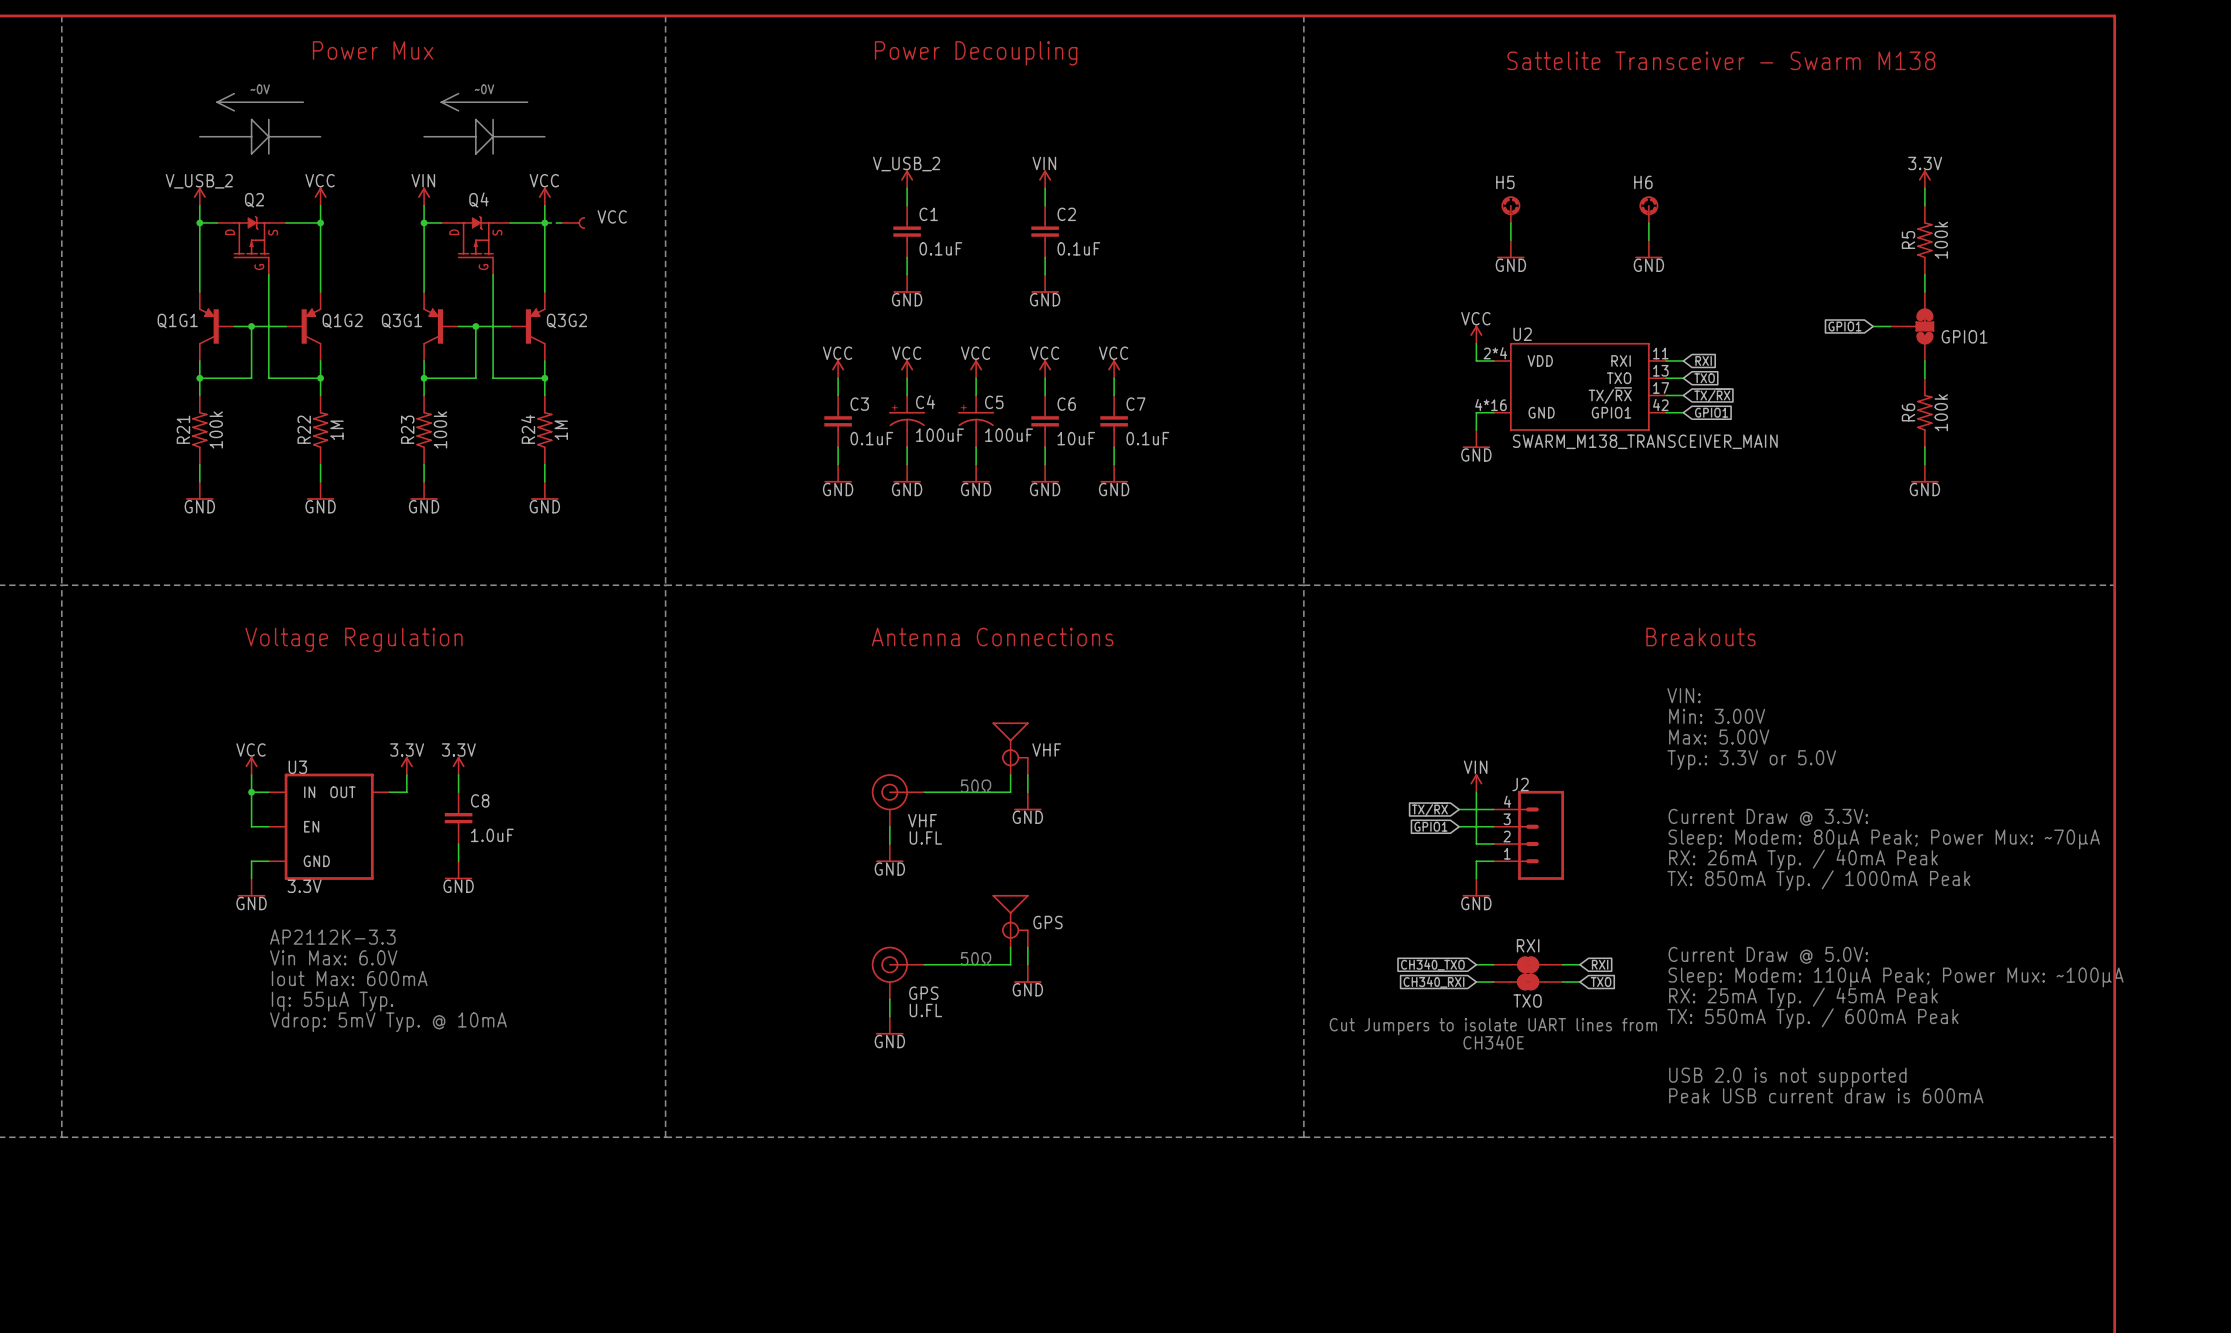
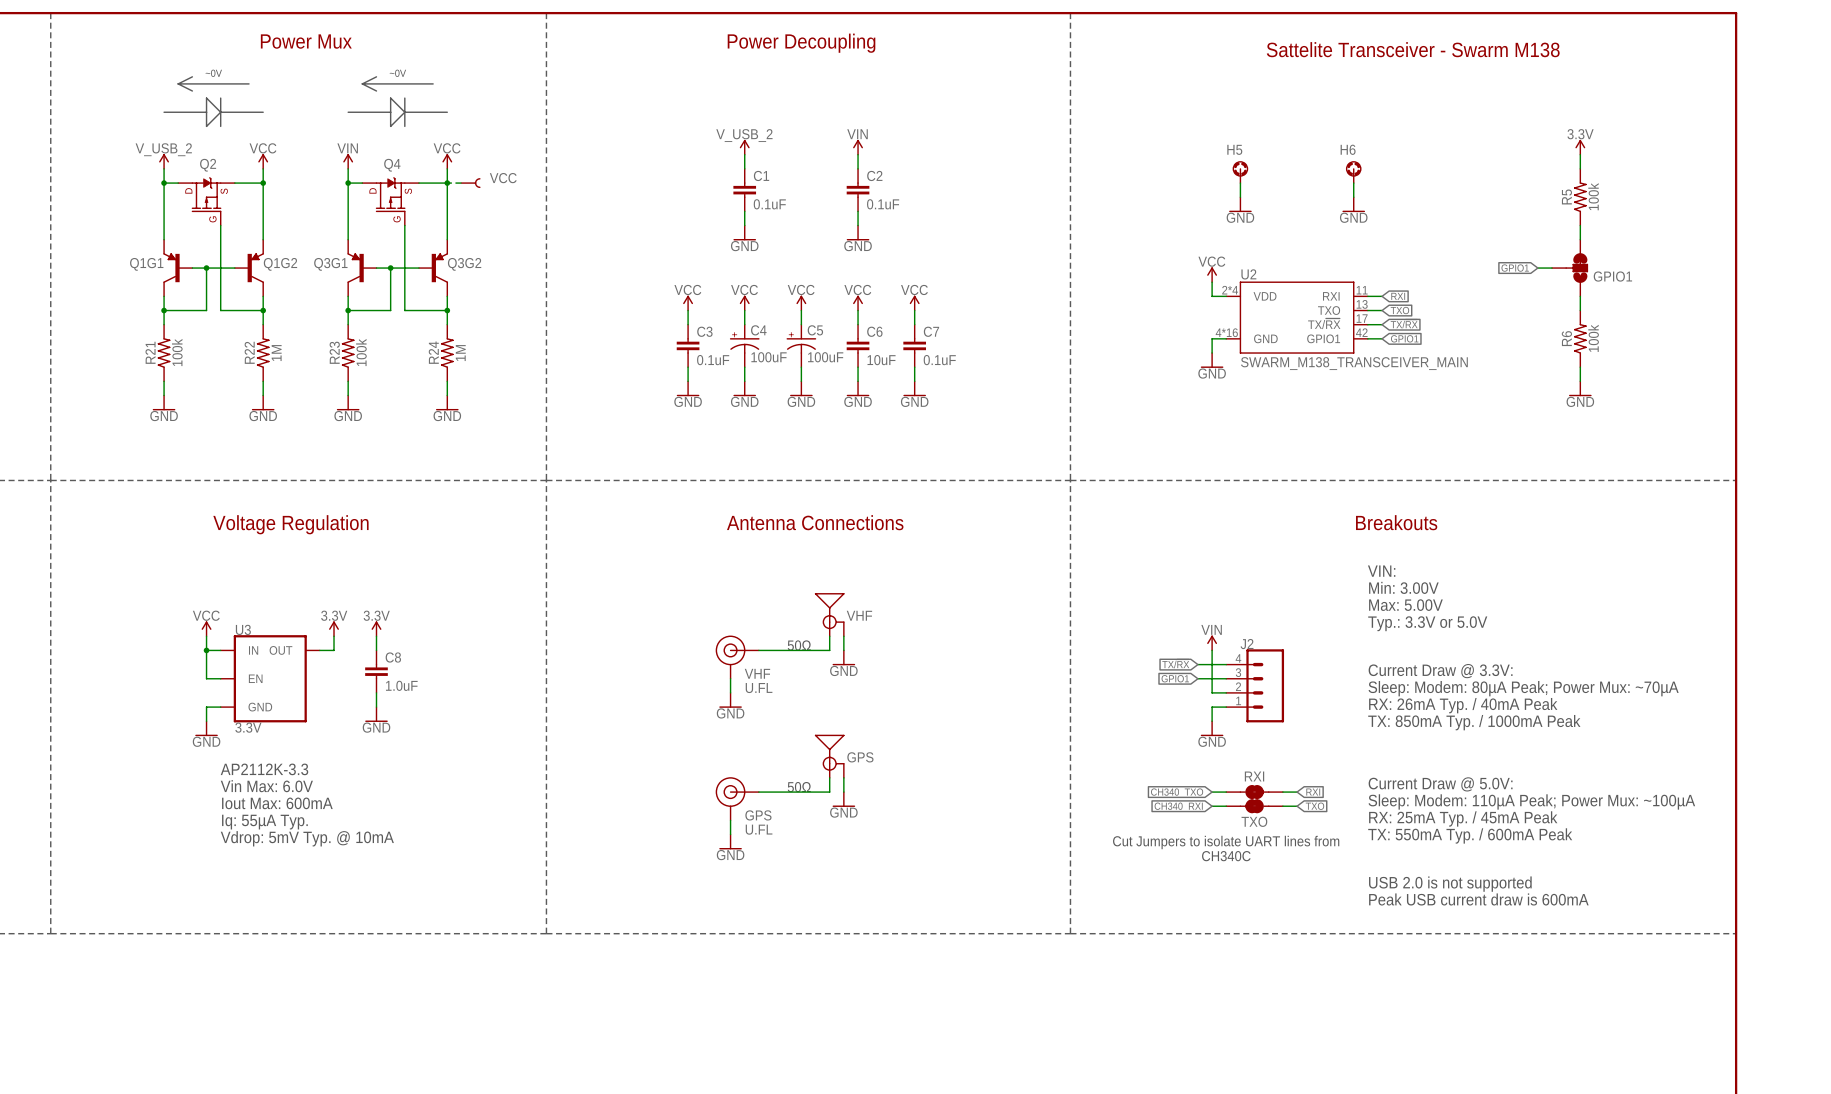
text: CH340E (1493, 1042) -> CH340C (1226, 856)

